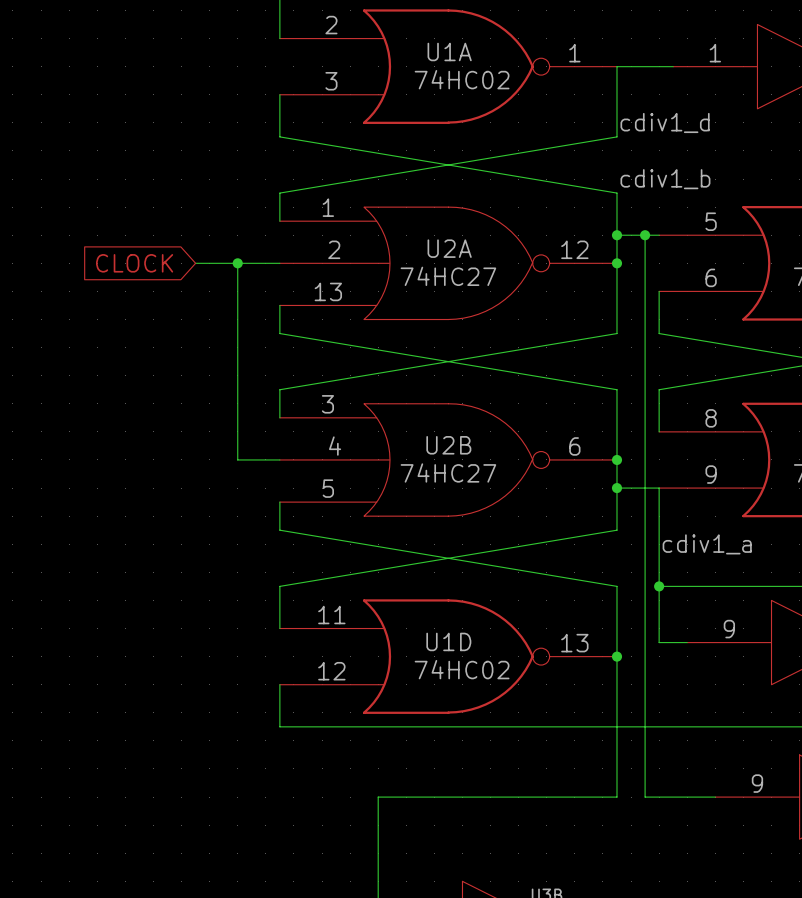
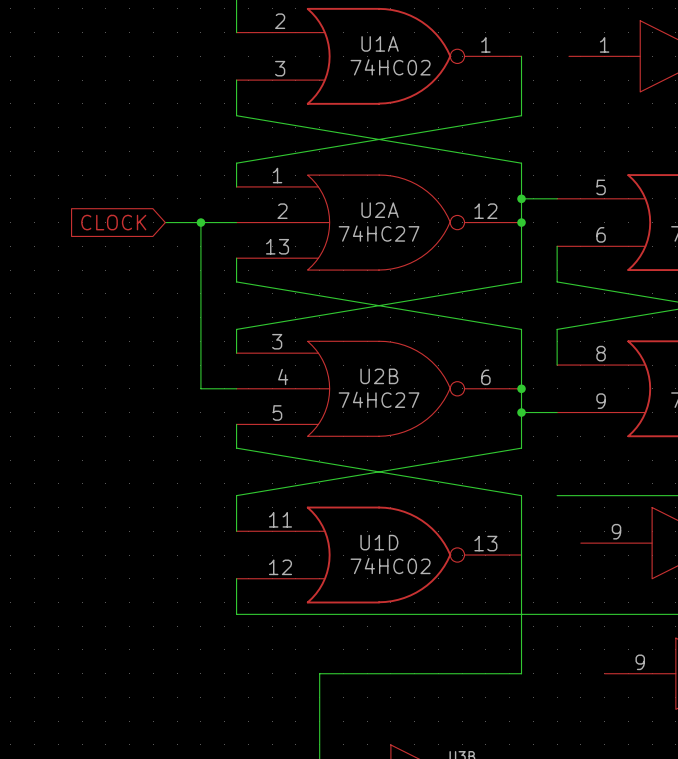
wire: (616, 66) (673, 66) -> none
label: cdiv1_d (665, 122) -> none
label: cdiv1_b (665, 179) -> none
wire: (645, 235) (645, 797) (715, 797) -> none
junction: (645, 235) -> none
wire: (659, 488) (659, 642) (687, 642) -> none
label: cdiv1_a (707, 544) -> none
junction: (659, 586) -> none
junction: (616, 656) -> none

